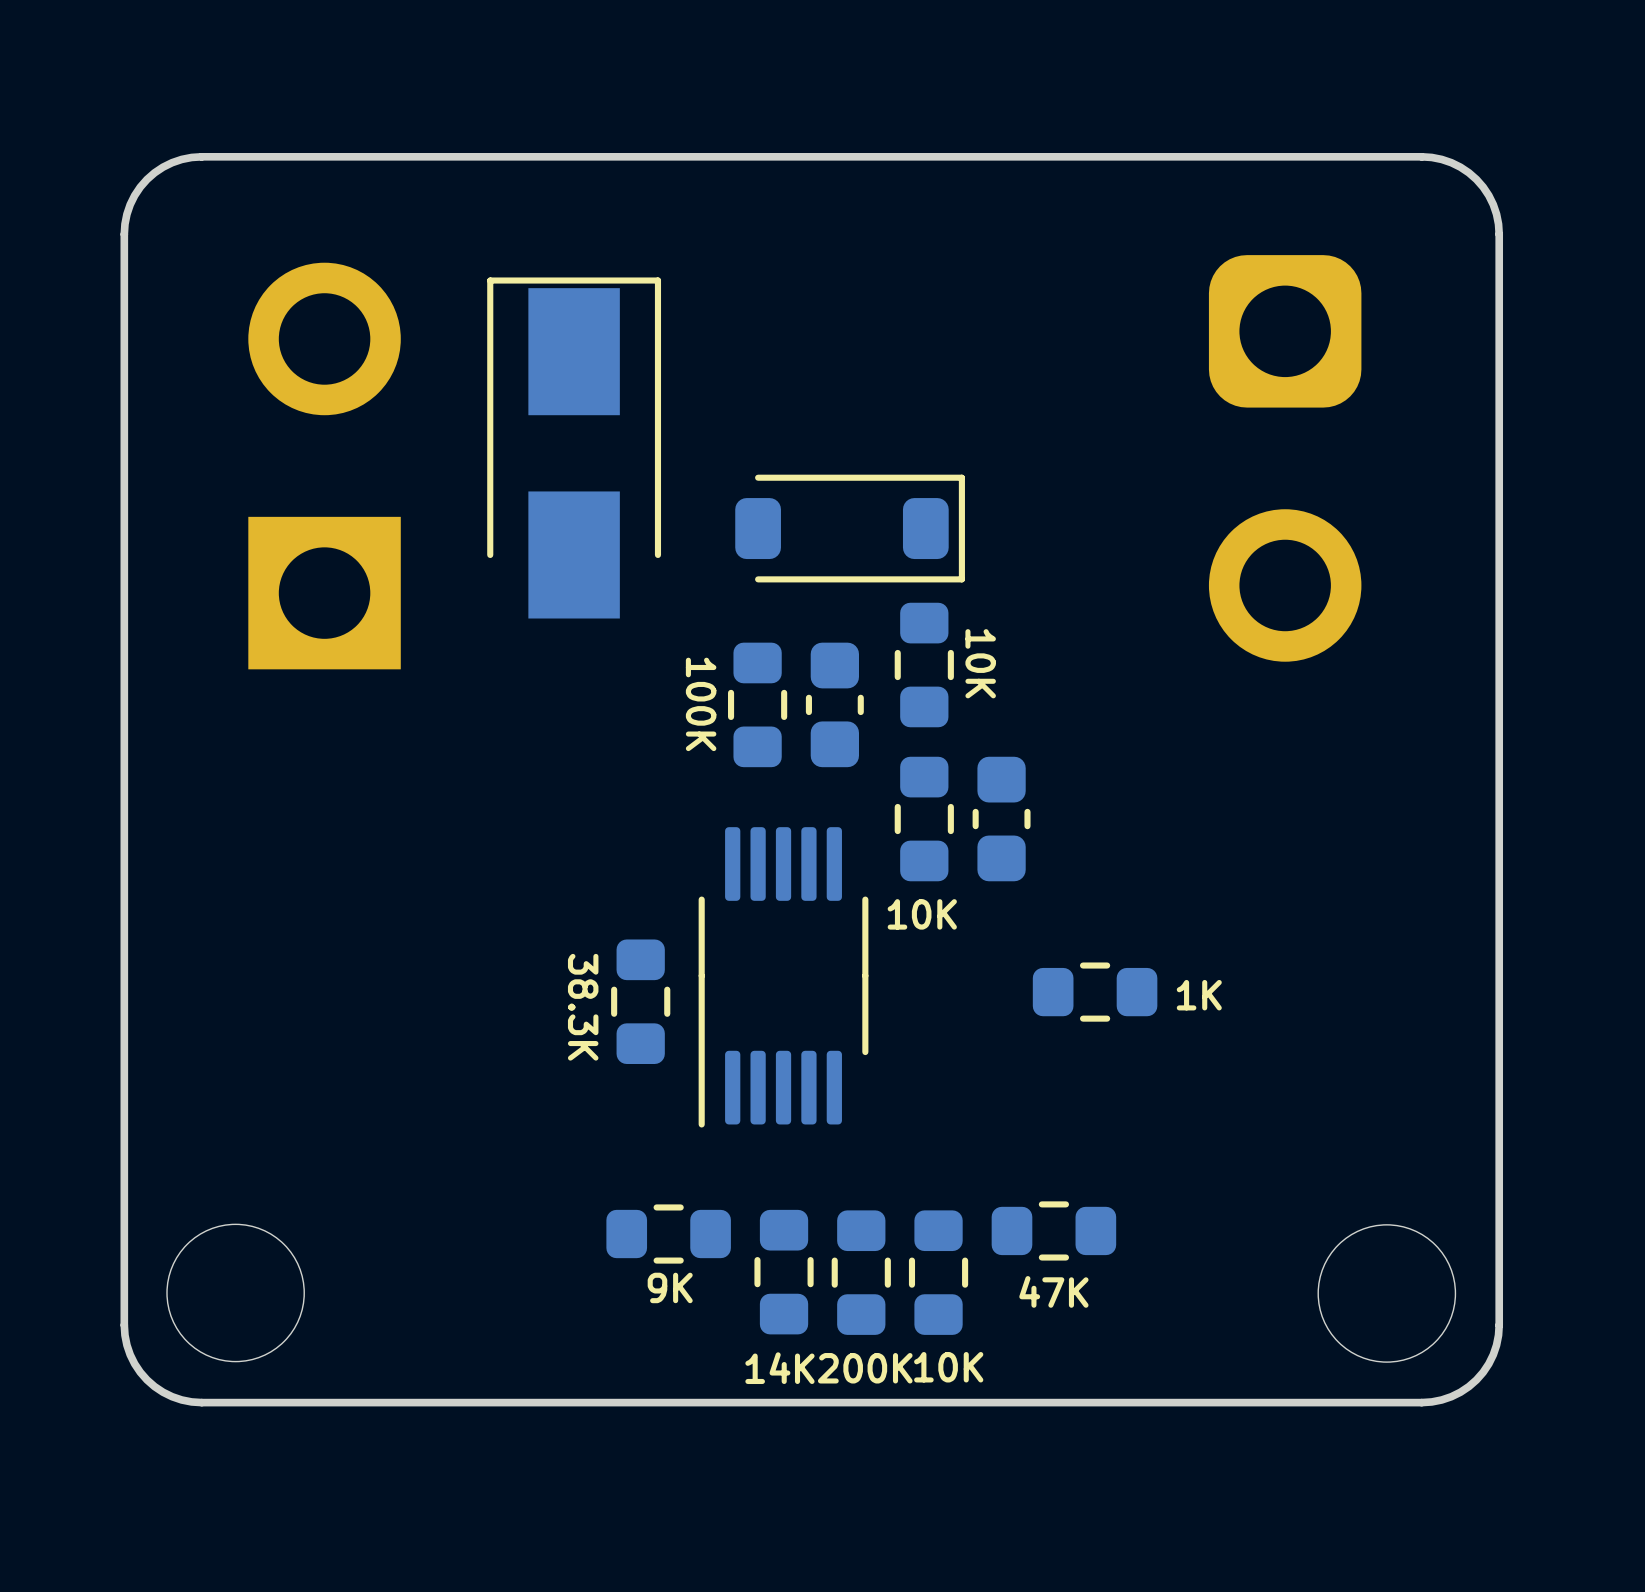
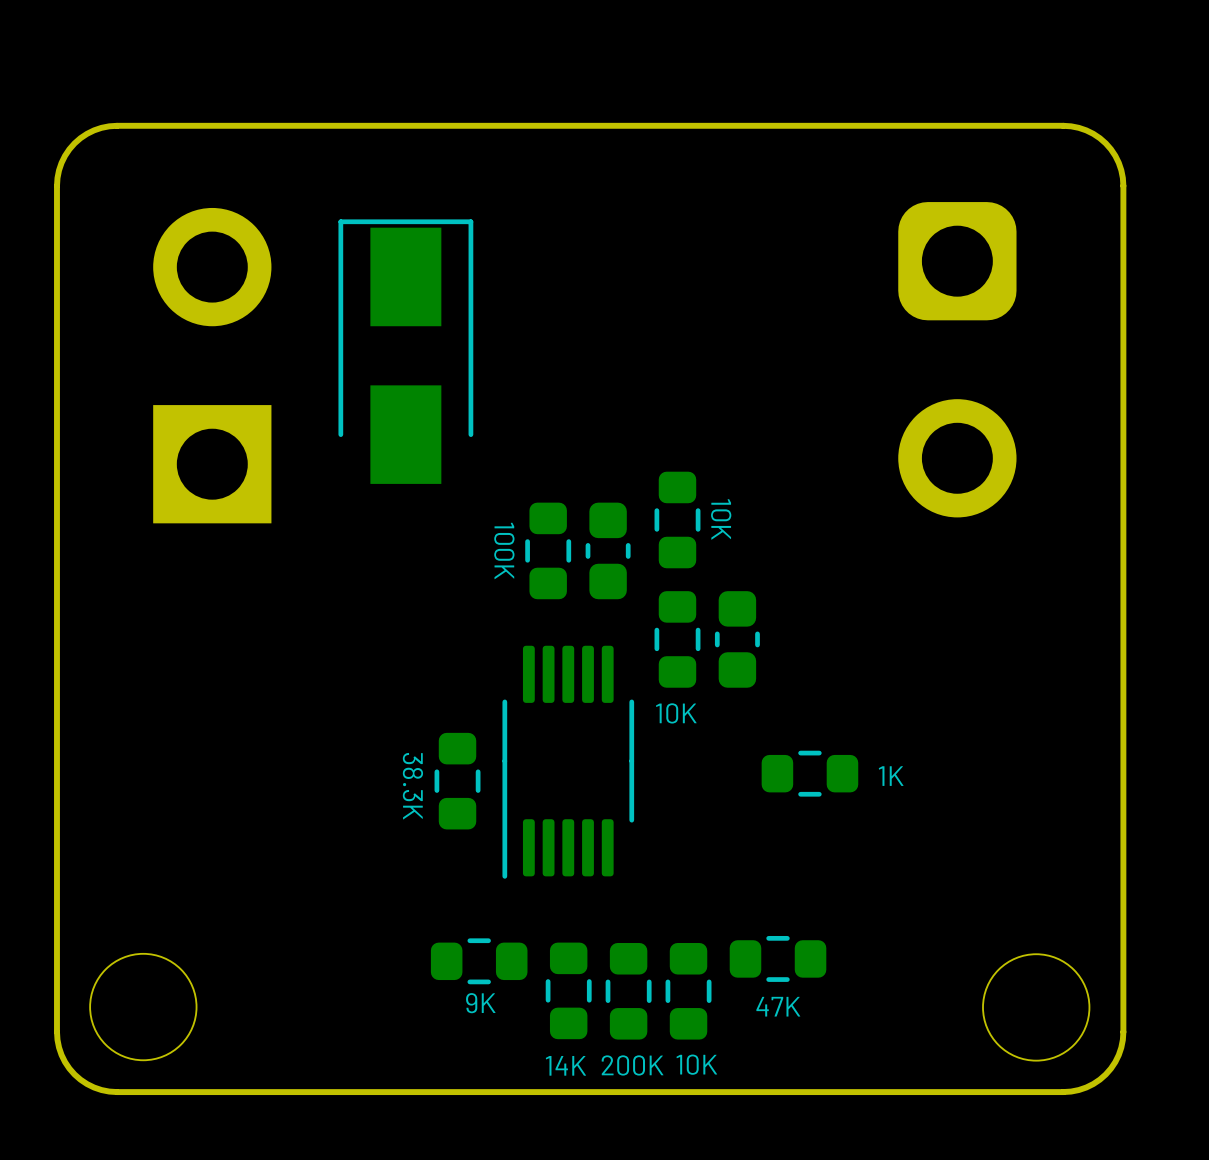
part: (850, 528) -> none

